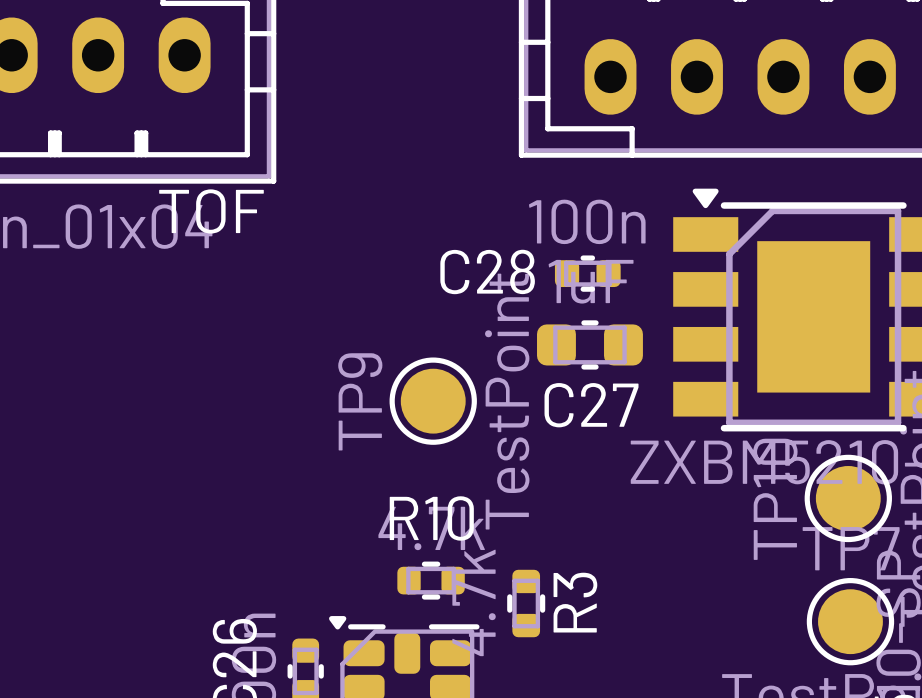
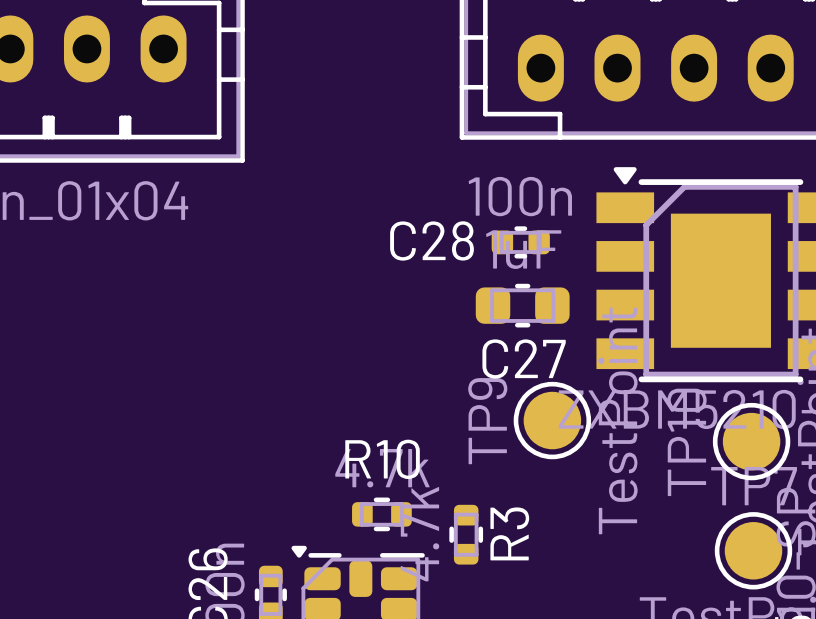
text: TOF (211, 211) -> none
TP9 position: (433, 401) -> (552, 420)

